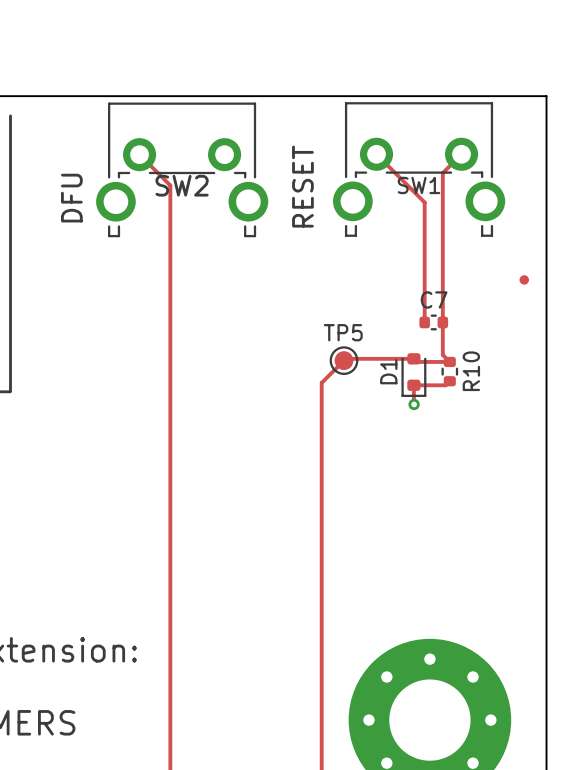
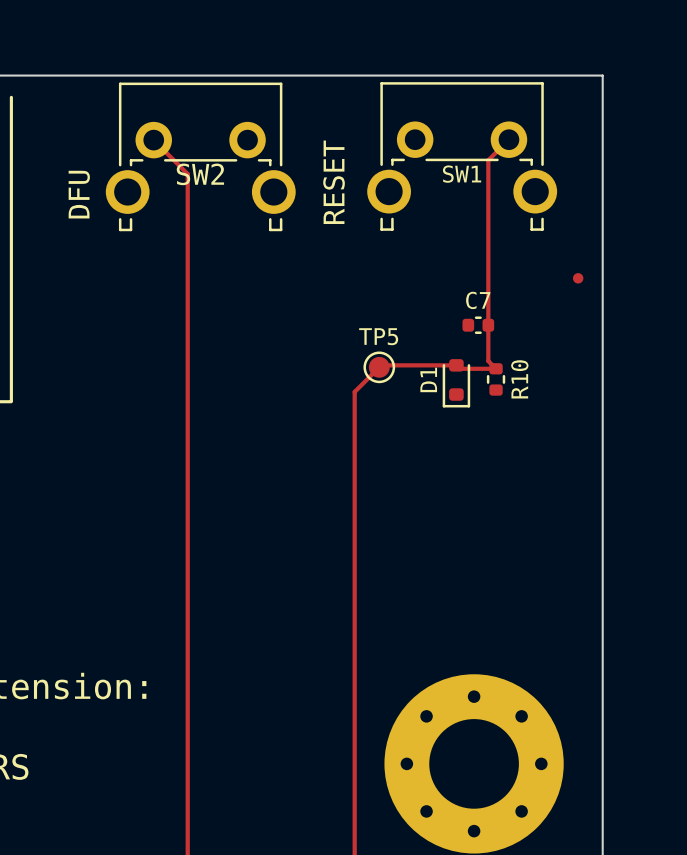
track: (376, 154) (424, 202) (424, 322) -> none
track: (449, 381) (445, 385) (413, 385) (413, 404) -> none
via: (414, 404) -> none

